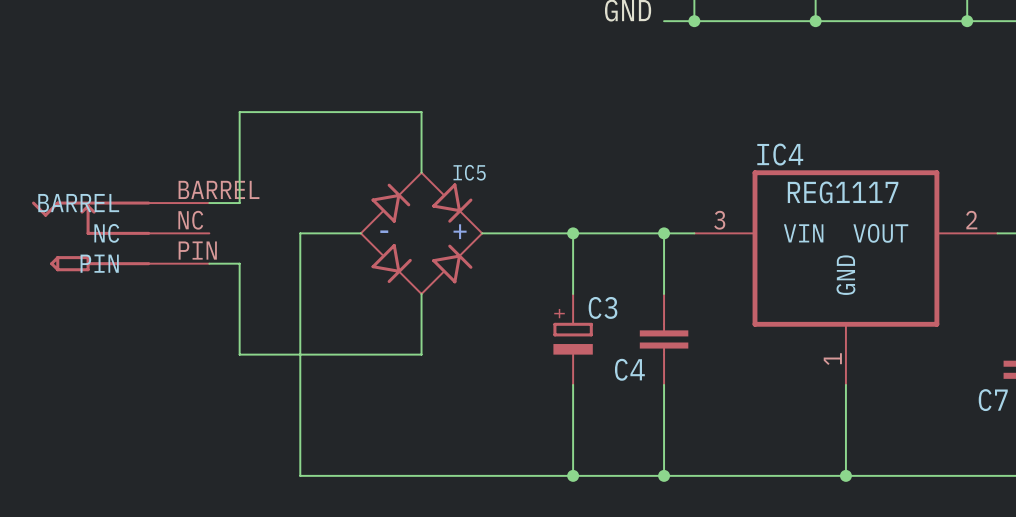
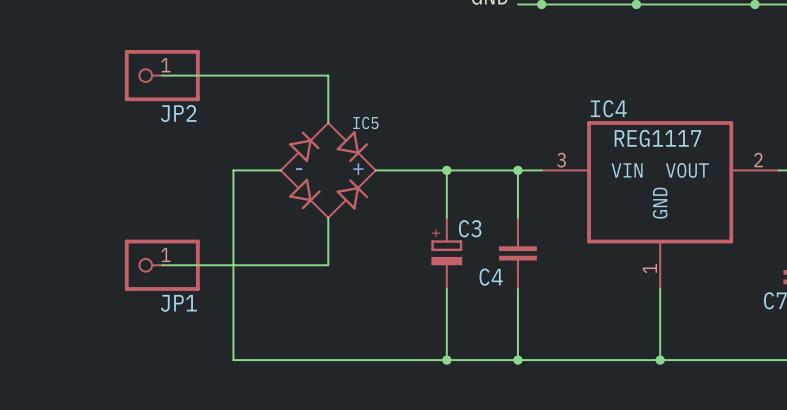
JP2: none -> (162, 75)
wire: (239, 112) (239, 203) (209, 203) -> (186, 75) (162, 75)
part: (120, 236) -> none
wire: (209, 263) (239, 263) (239, 354) -> (162, 265) (186, 265)
JP1: none -> (162, 265)

